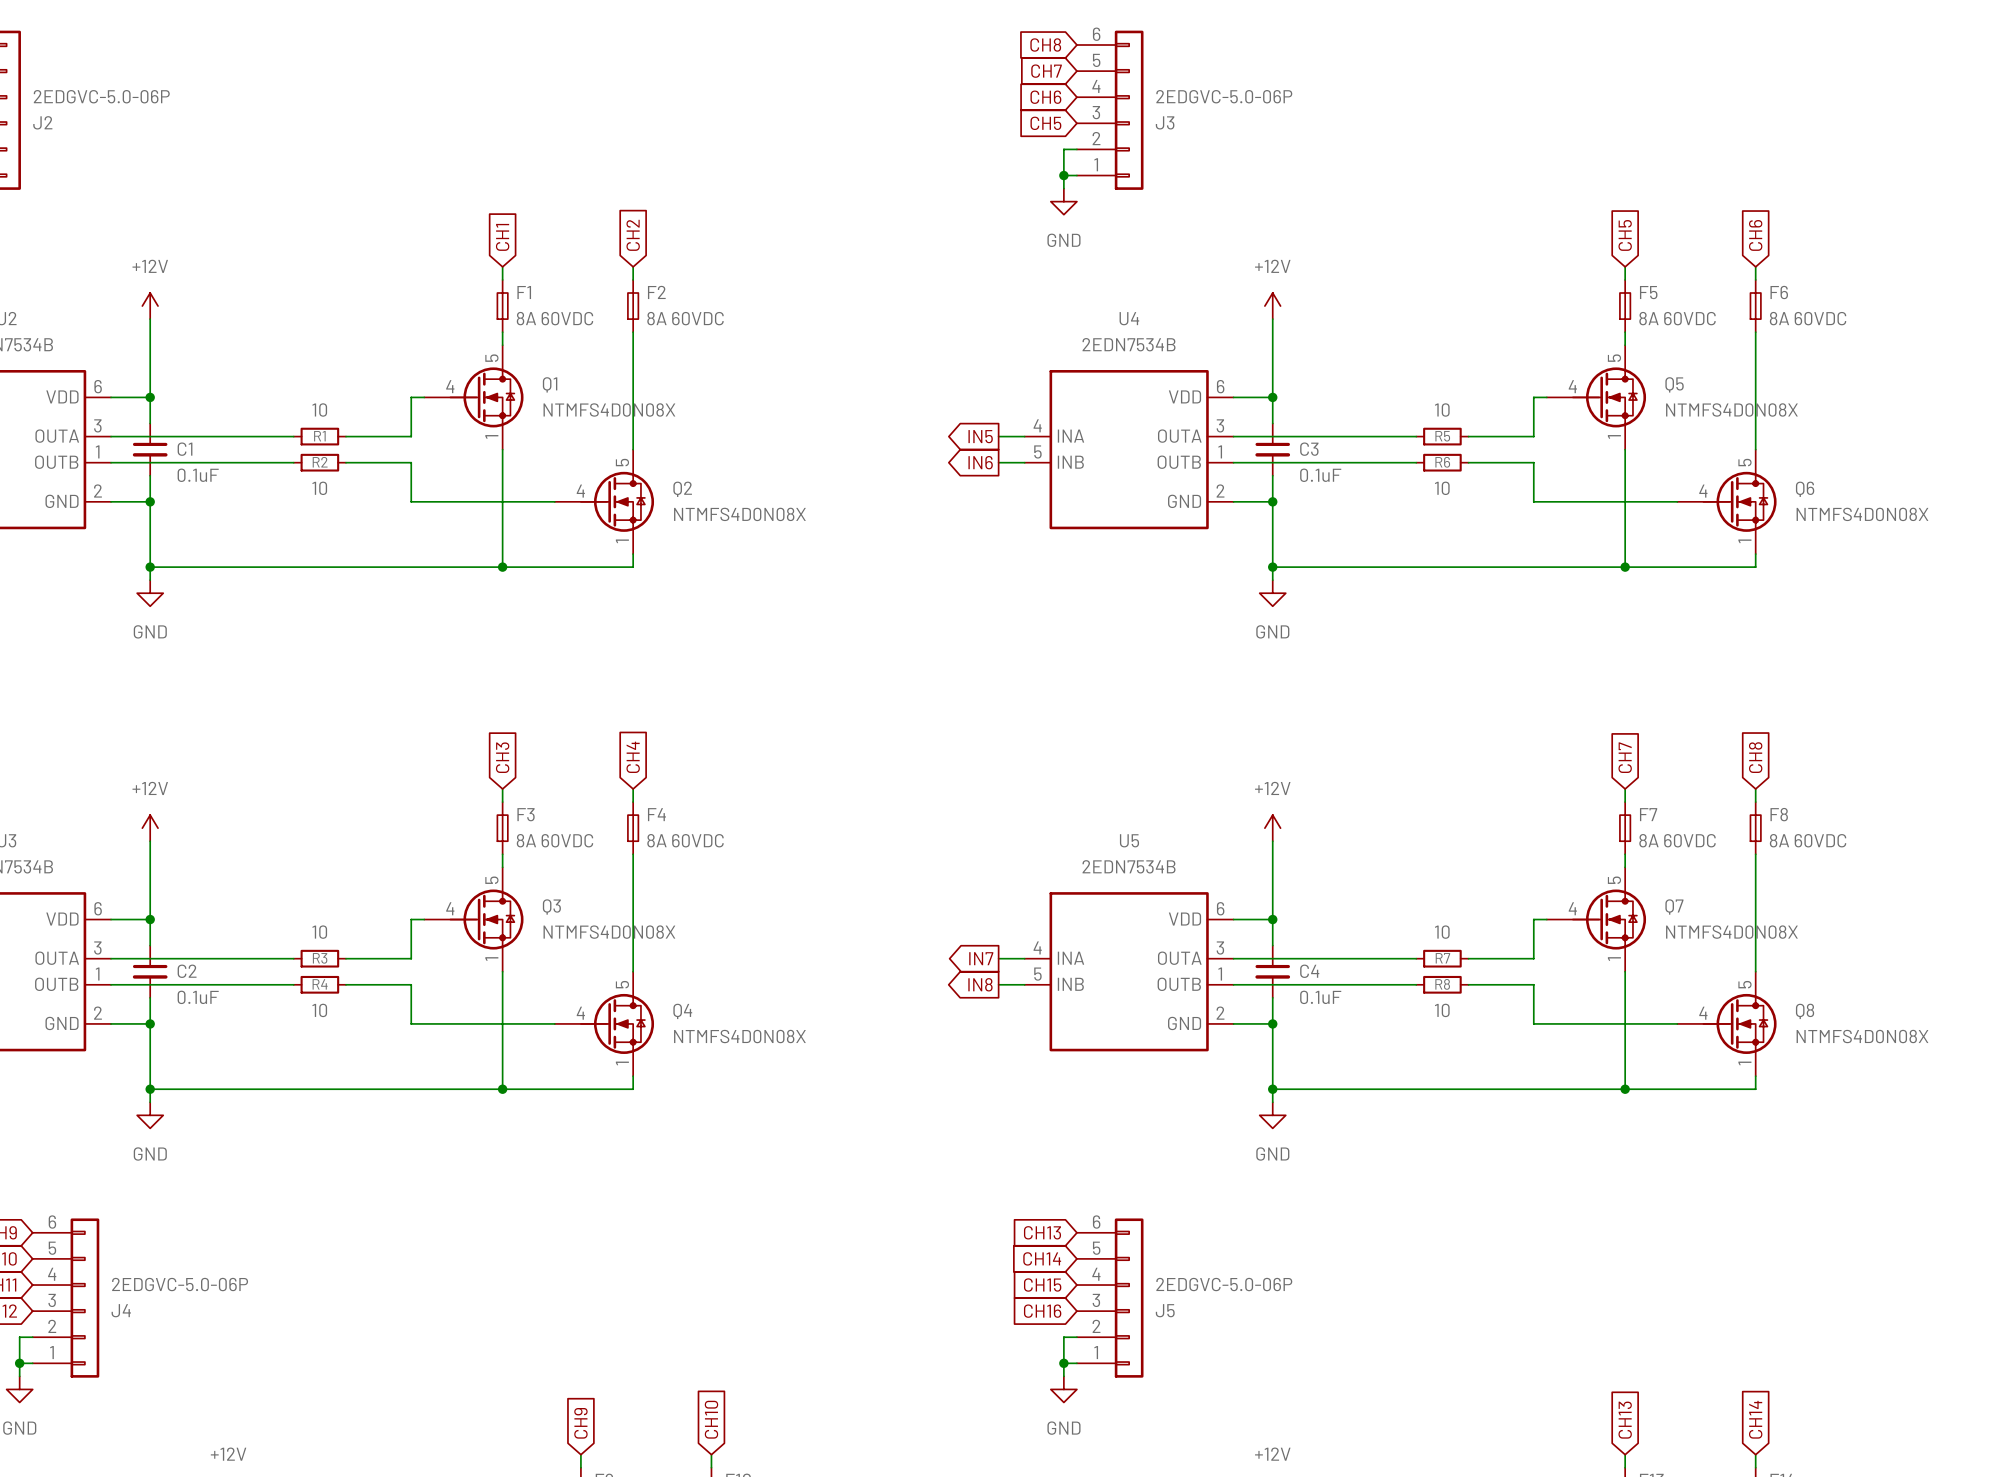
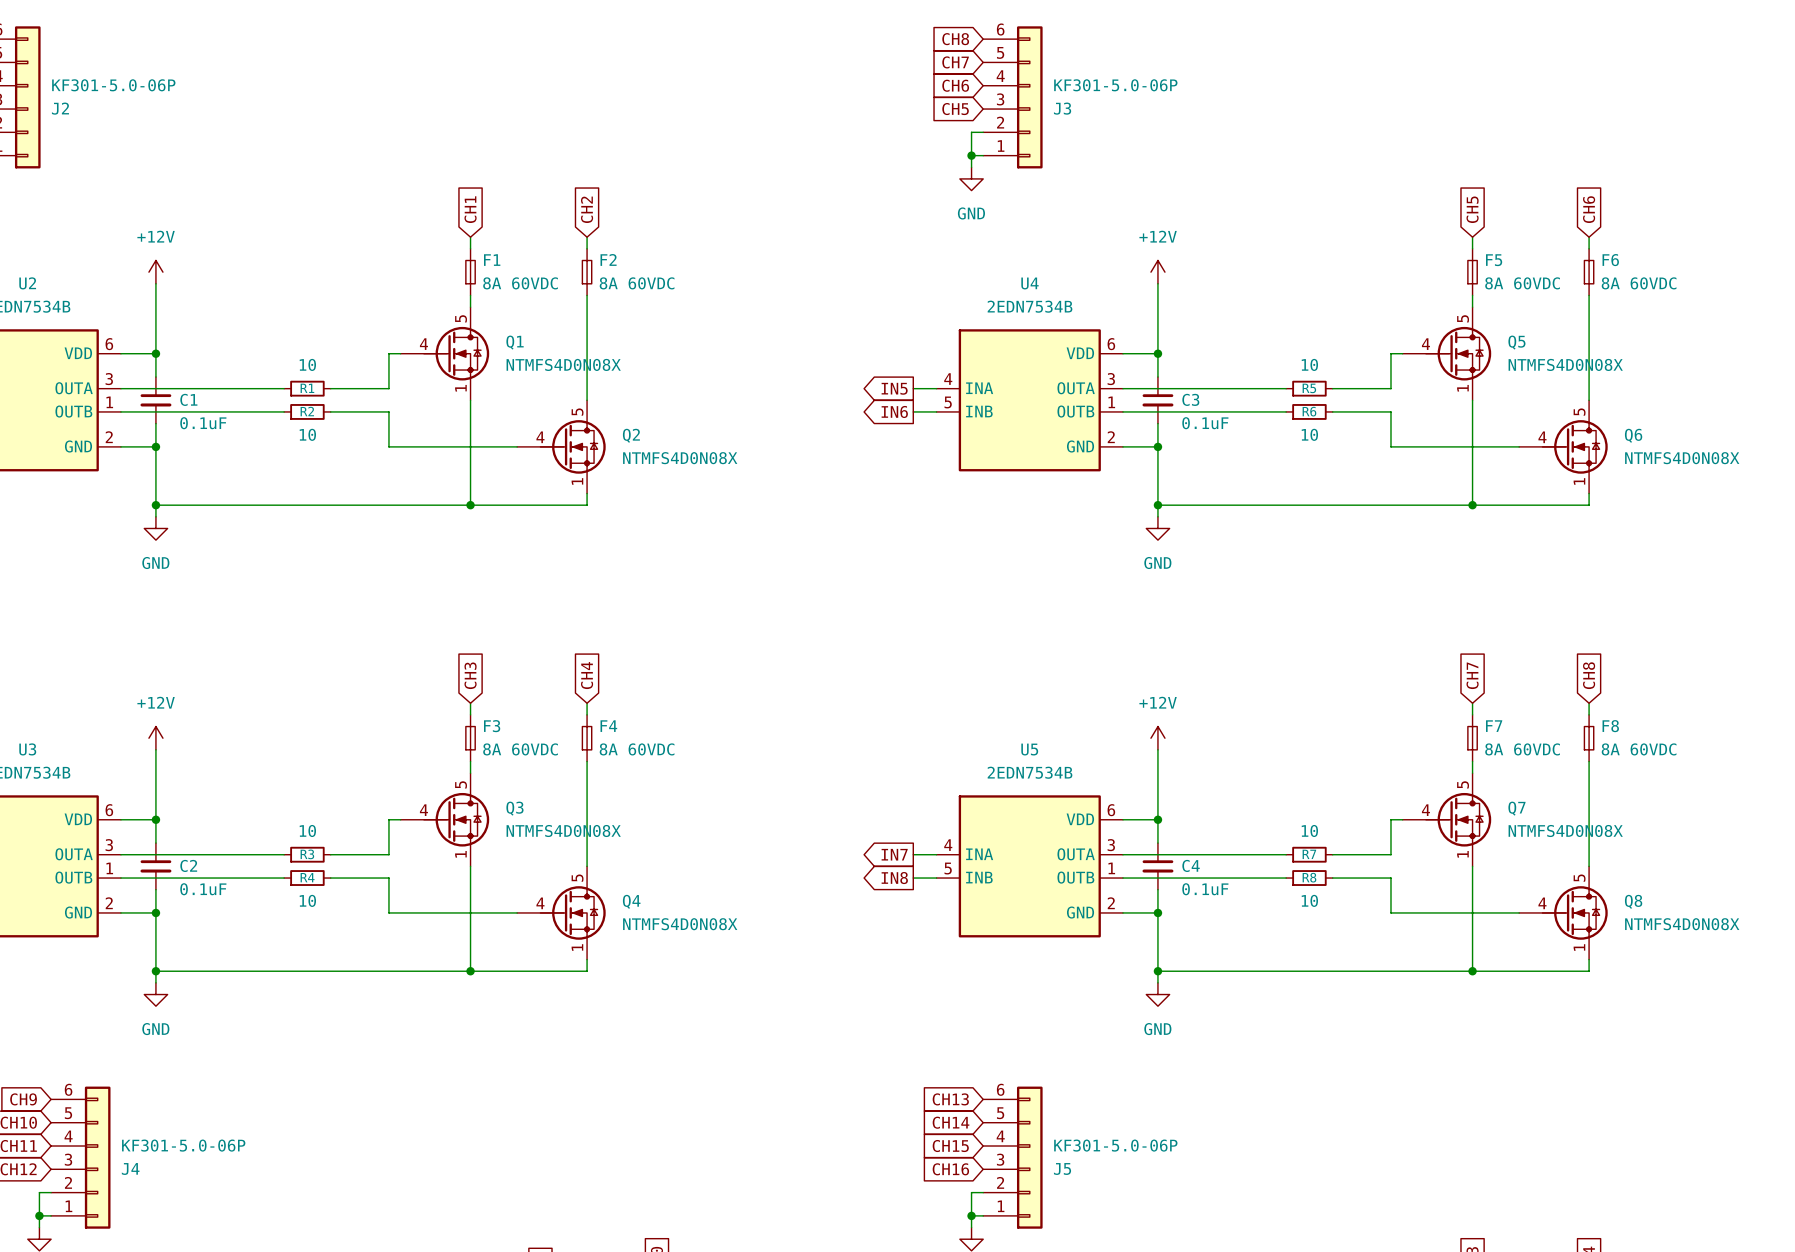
J2 value: 2EDGVC-5.0-06P (101, 96) -> KF301-5.0-06P (113, 85)
J3 value: 2EDGVC-5.0-06P (1224, 96) -> KF301-5.0-06P (1115, 85)
J4 value: 2EDGVC-5.0-06P (180, 1284) -> KF301-5.0-06P (183, 1145)
J5 value: 2EDGVC-5.0-06P (1224, 1284) -> KF301-5.0-06P (1115, 1145)

